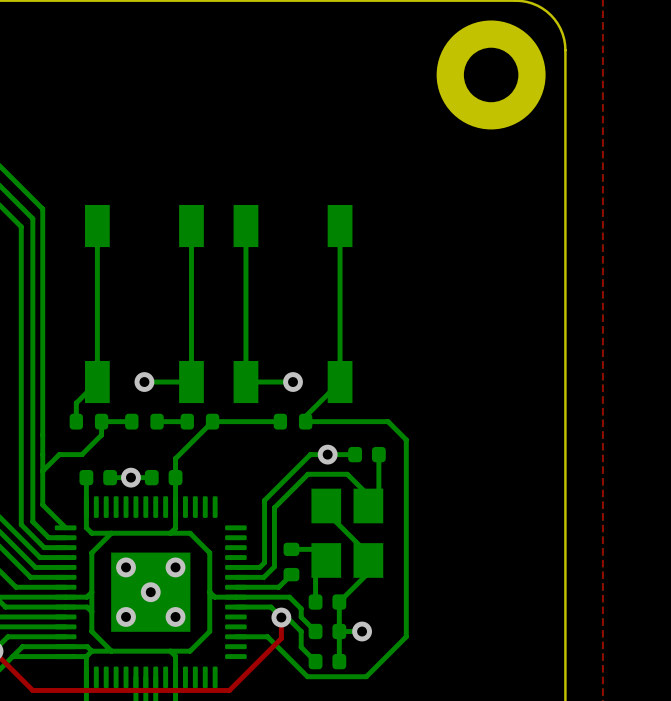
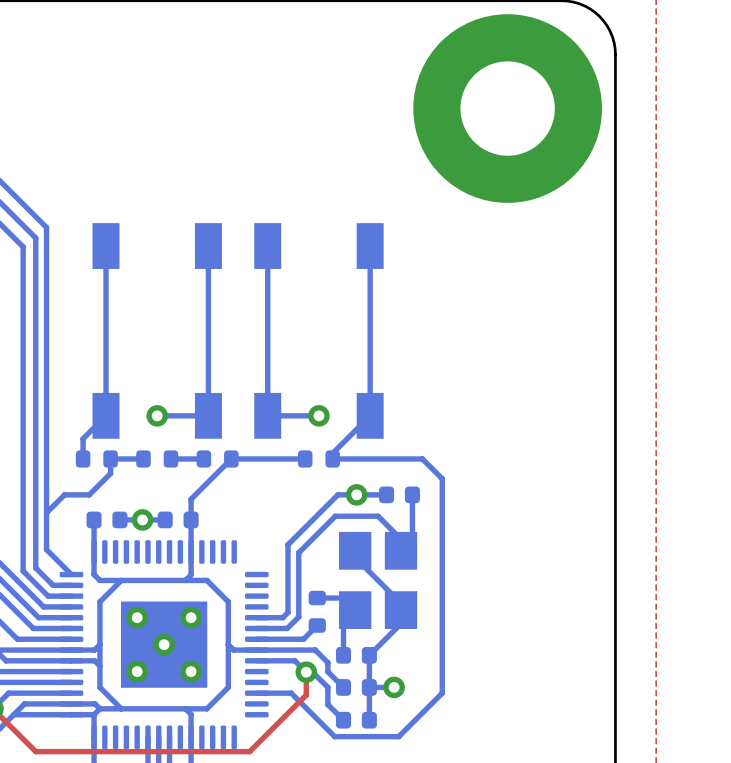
part: (491, 74) -> none
part: none -> (507, 108)

